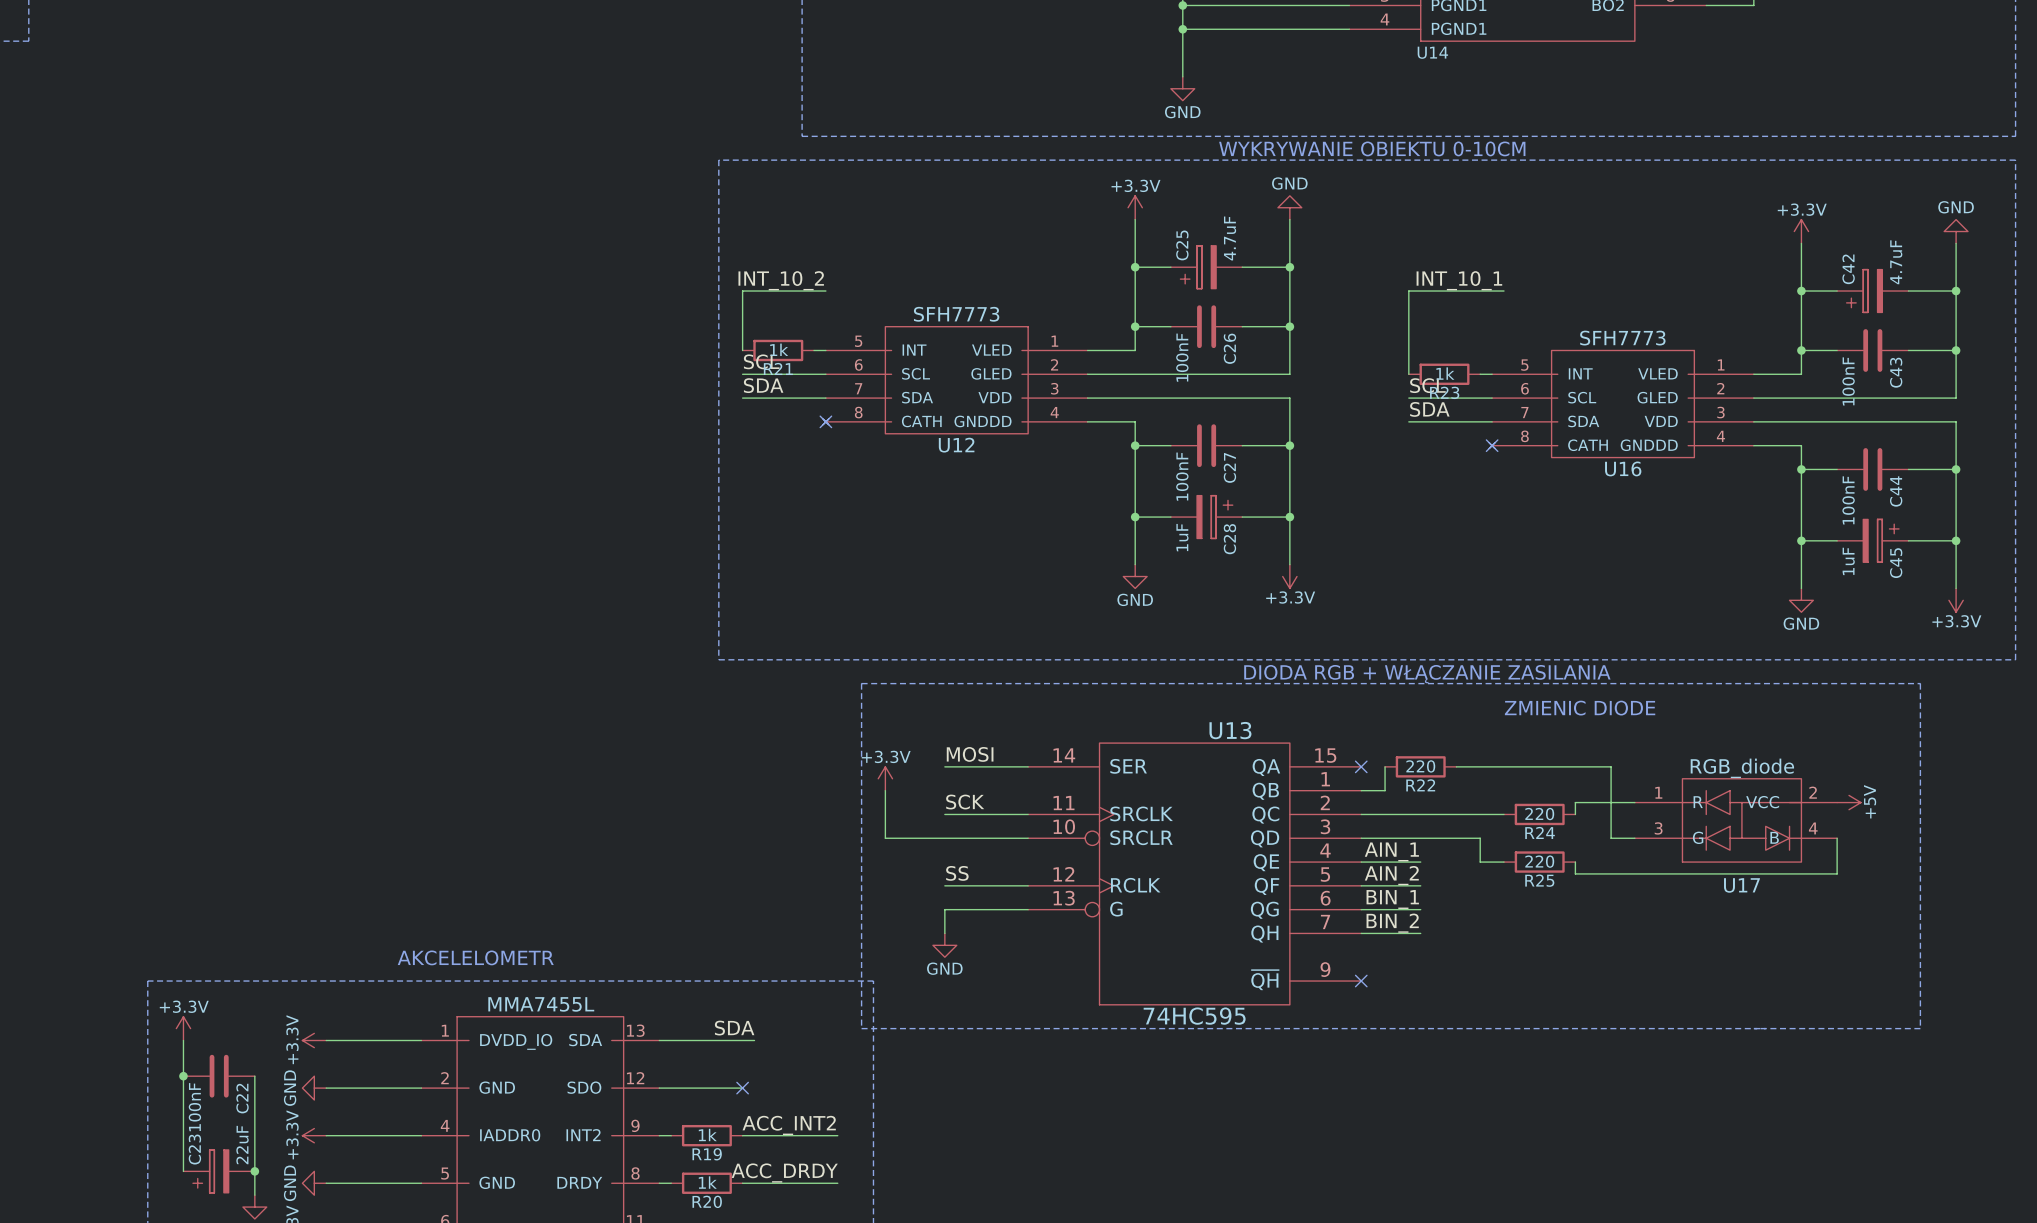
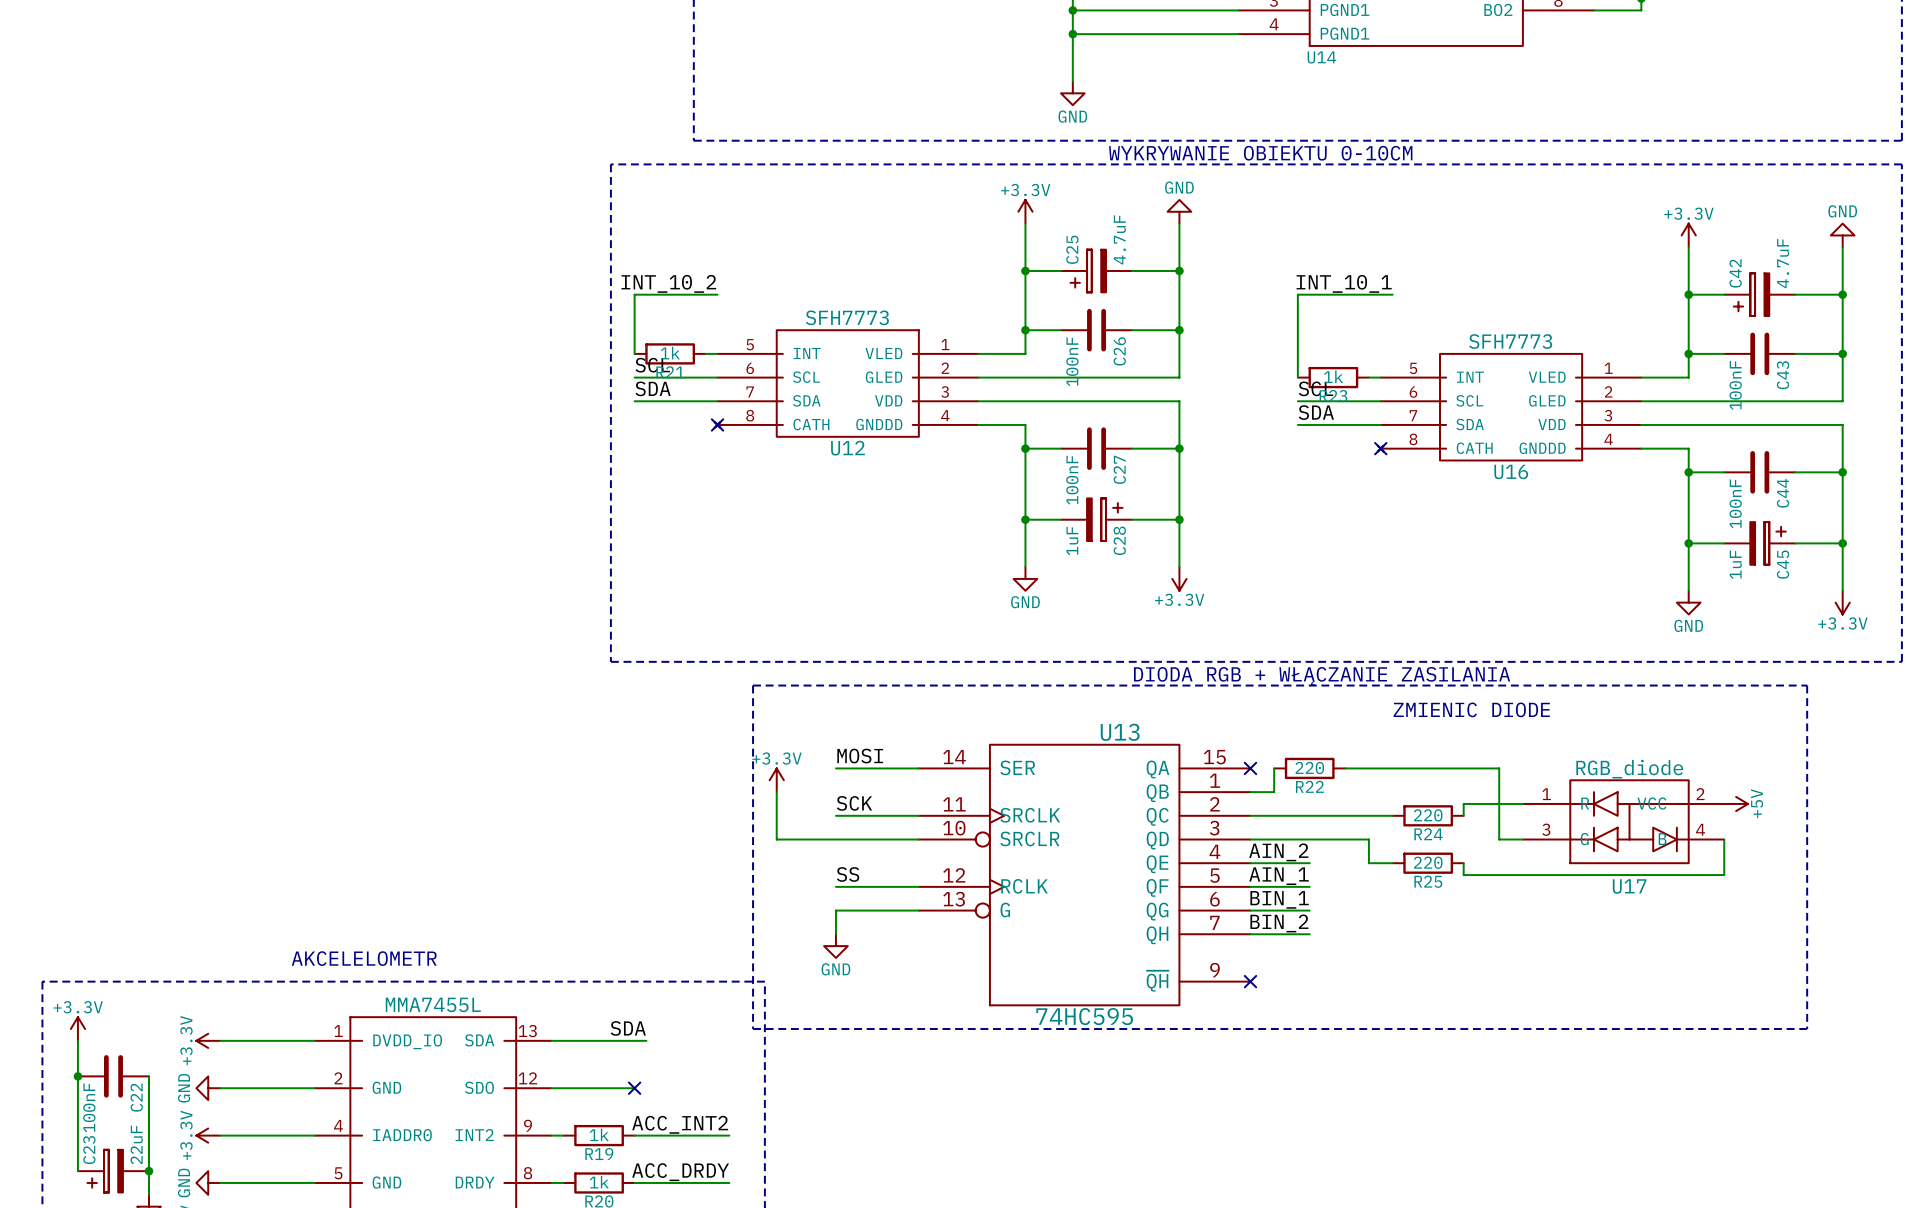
label: AIN_1 (1391, 851) -> AIN_2 (1278, 852)
label: AIN_2 (1391, 875) -> AIN_1 (1279, 876)

